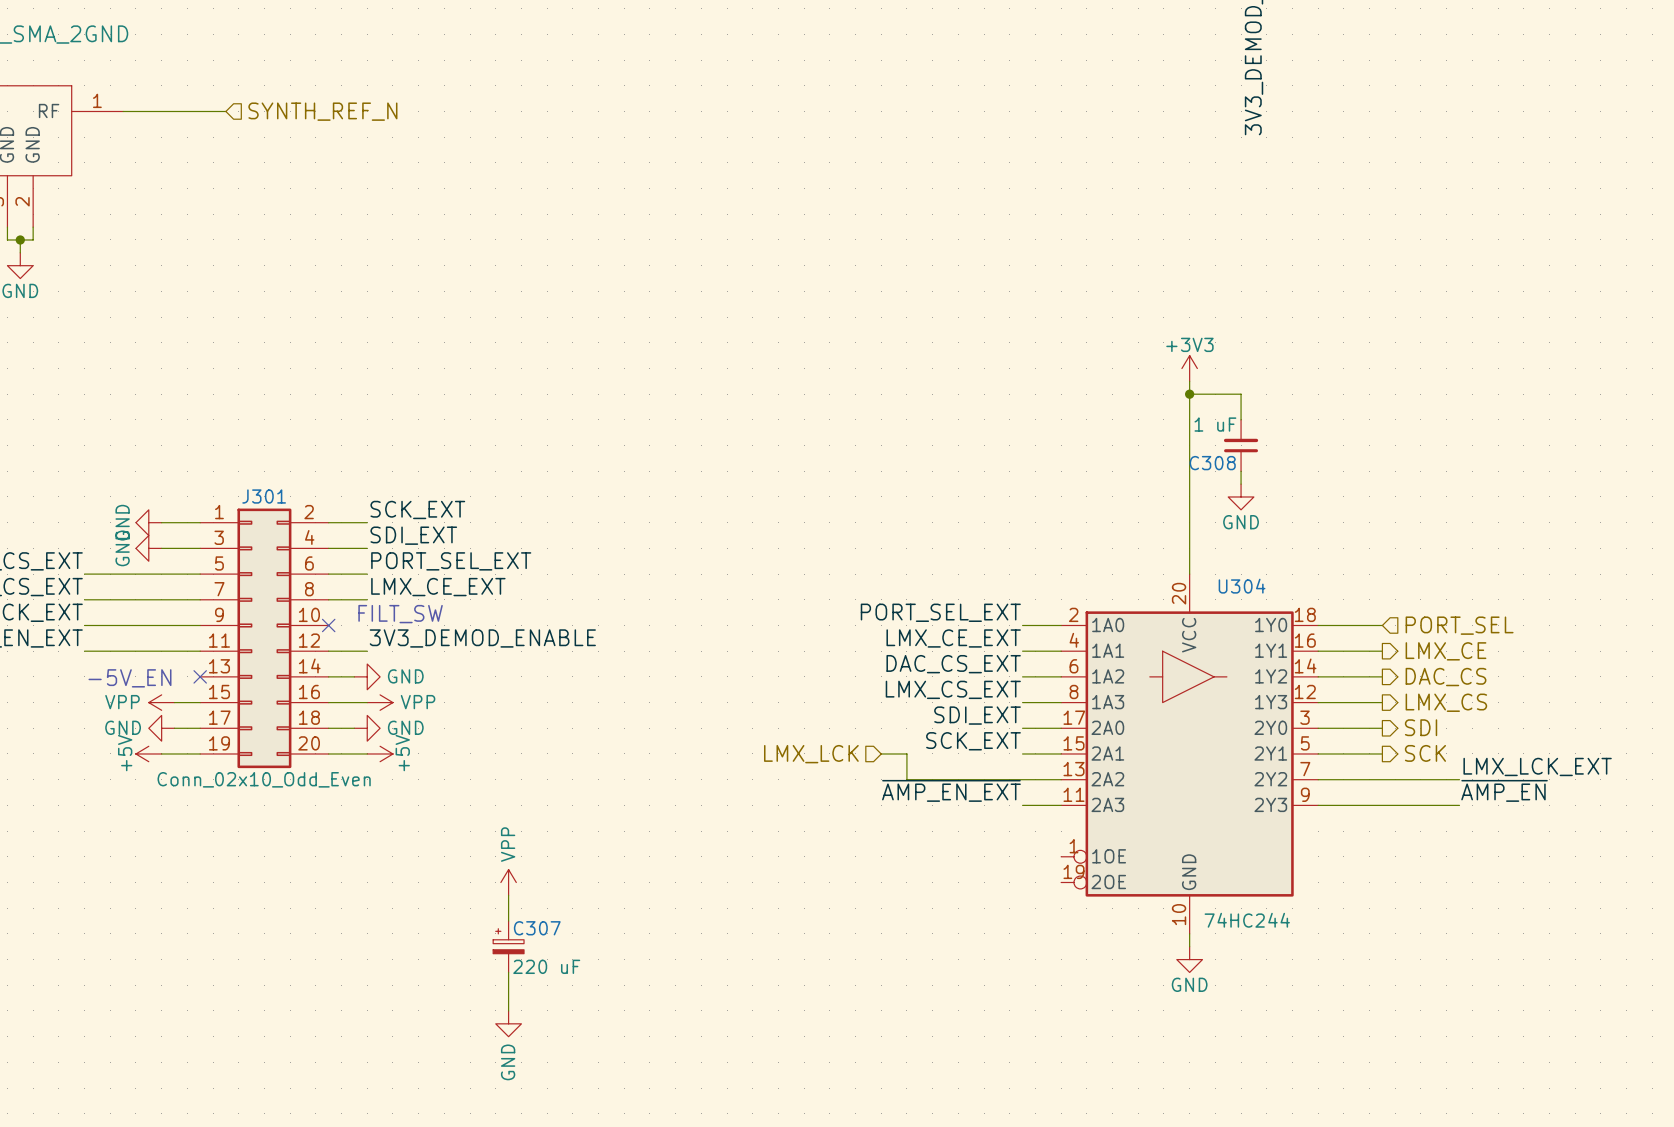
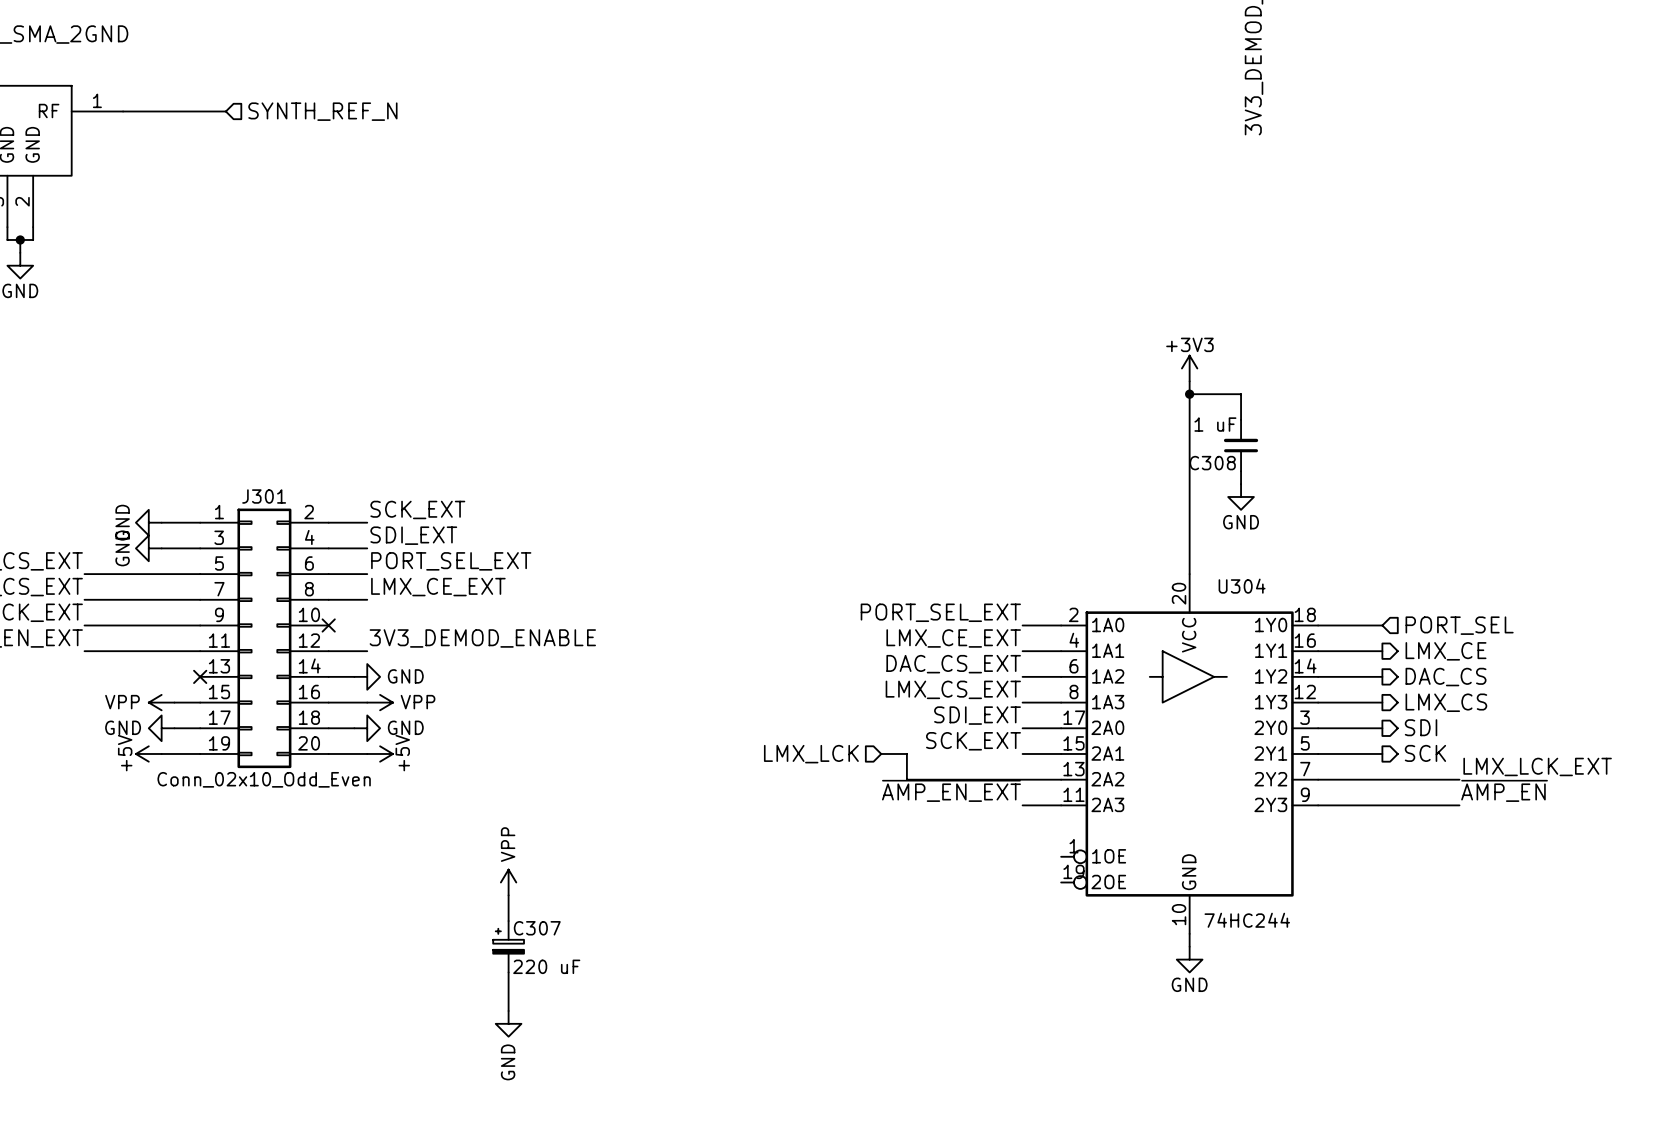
text: FILT_SW (400, 614) -> none
text: -5V_EN (129, 678) -> none

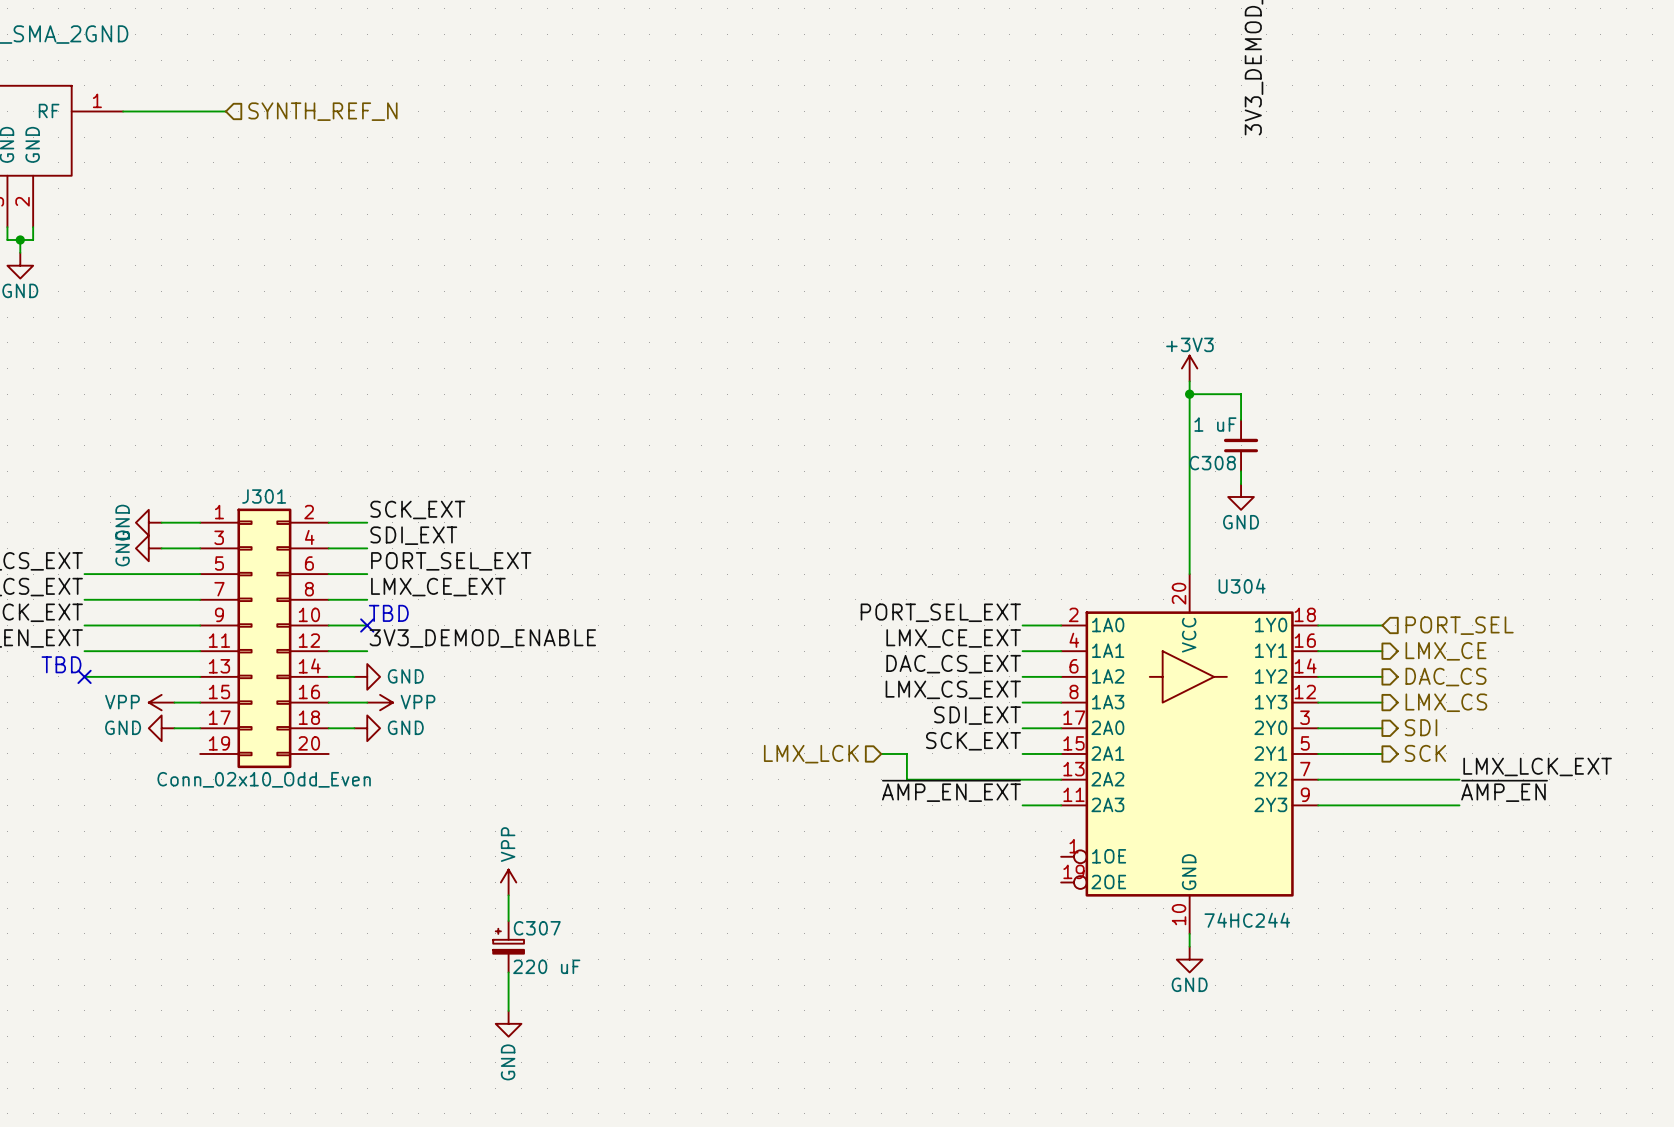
text: none -> TBD (388, 613)
no-connect mark position: (328, 625) -> (367, 625)
text: none -> TBD (61, 664)
wire: none -> (84, 676) (200, 676)
no-connect mark: none -> (84, 676)
no-connect mark: (200, 676) -> none
power symbol: +5V (148, 753) -> none
wire: (161, 753) (200, 753) -> none
wire: (328, 753) (367, 753) -> (328, 625) (367, 625)
power symbol: +5V (380, 753) -> none

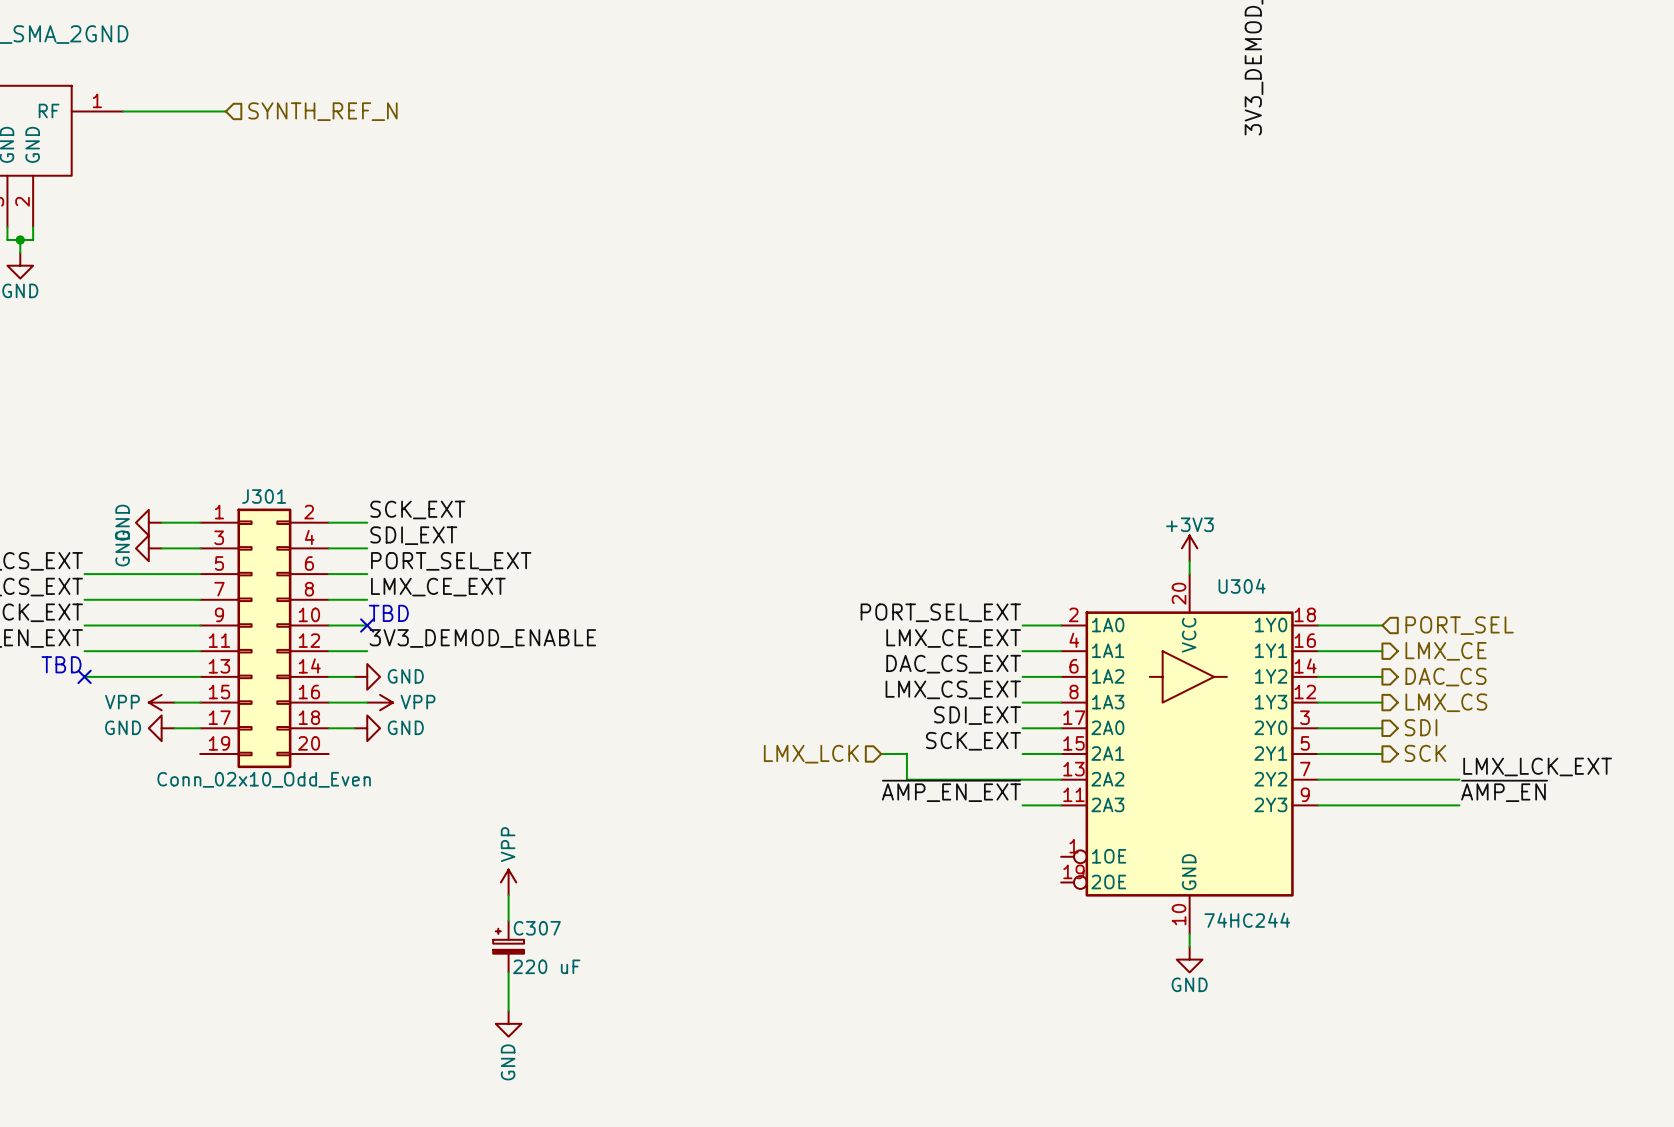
power symbol position: +3V3 (1189, 368) -> +3V3 (1189, 548)
wire: (1189, 381) (1189, 561) -> none
wire: (1189, 394) (1241, 394) (1241, 419) -> none
junction: (1189, 394) -> none
C308: 1 uF (1241, 445) -> none
wire: (1241, 471) (1241, 484) -> none
power symbol: GND (1241, 496) -> none

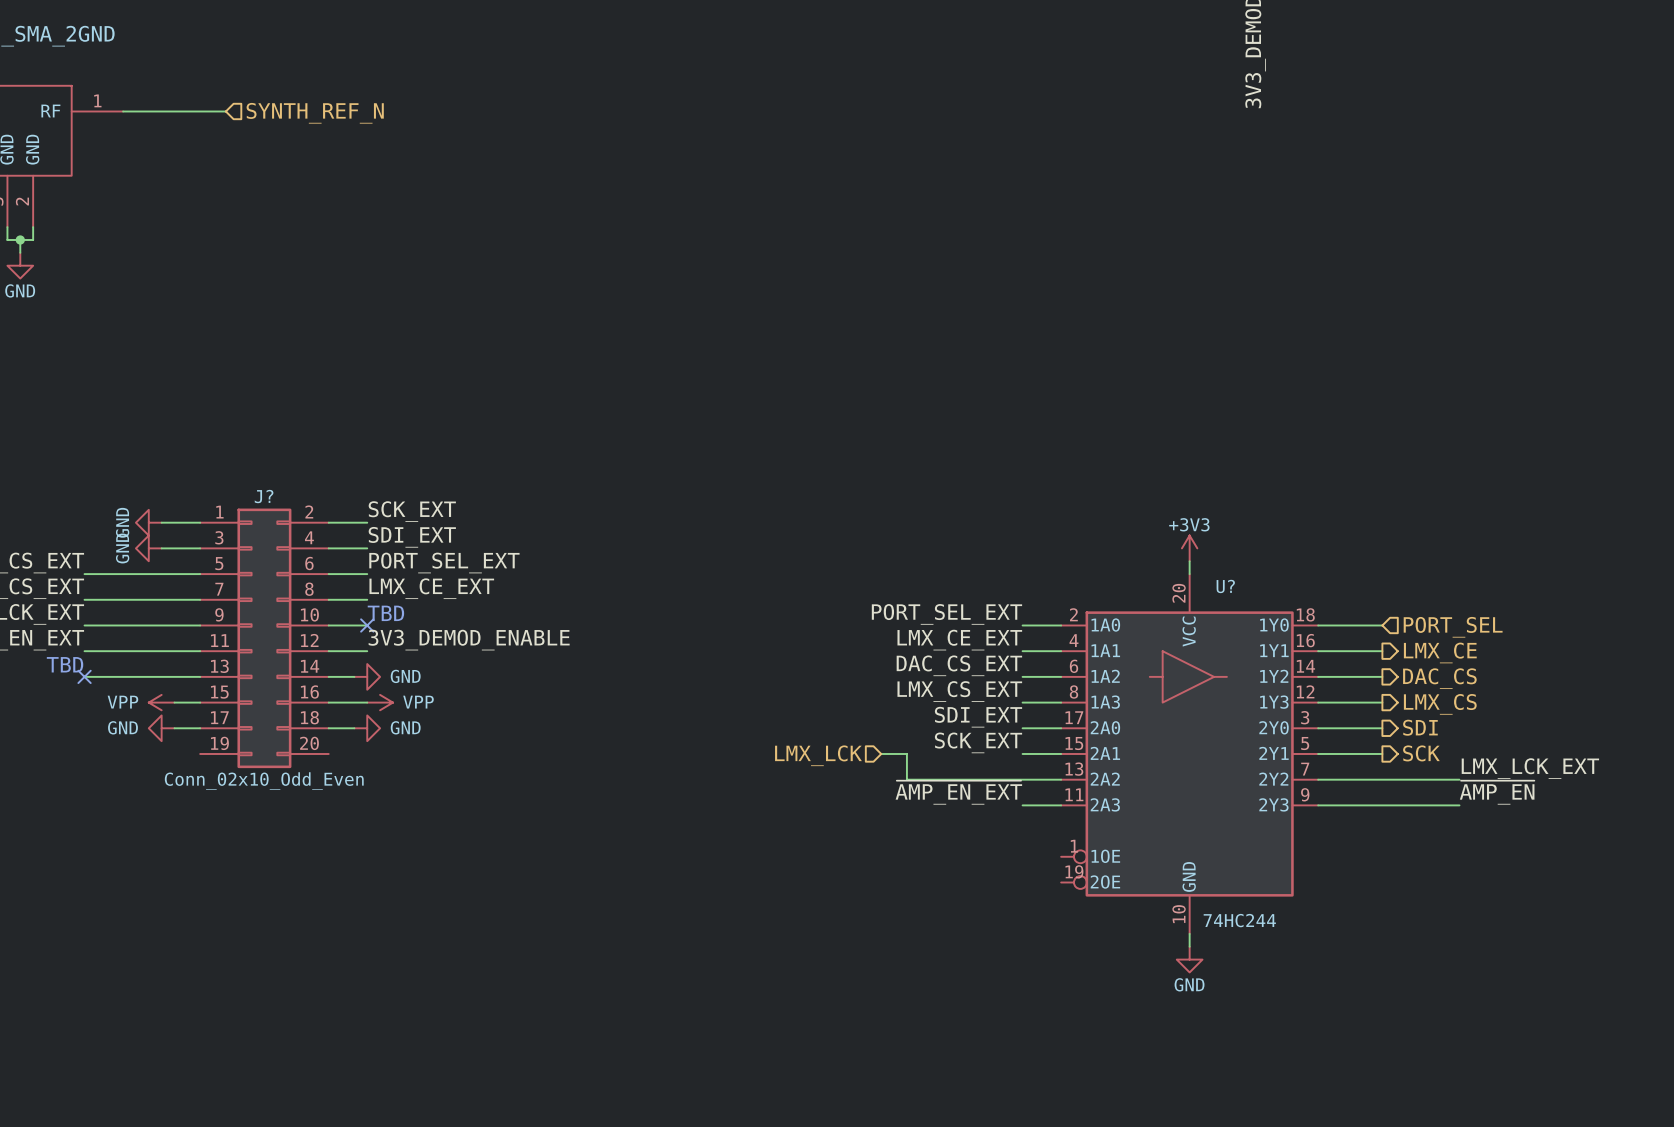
J301 name: J301 (264, 496) -> J? (264, 496)
U304 name: U304 (1242, 586) -> U? (1225, 586)
power symbol: VPP (508, 882) -> none
wire: (508, 895) (508, 921) -> none
C307: 220 uF (508, 946) -> none
wire: (508, 972) (508, 1010) -> none
power symbol: GND (508, 1023) -> none

